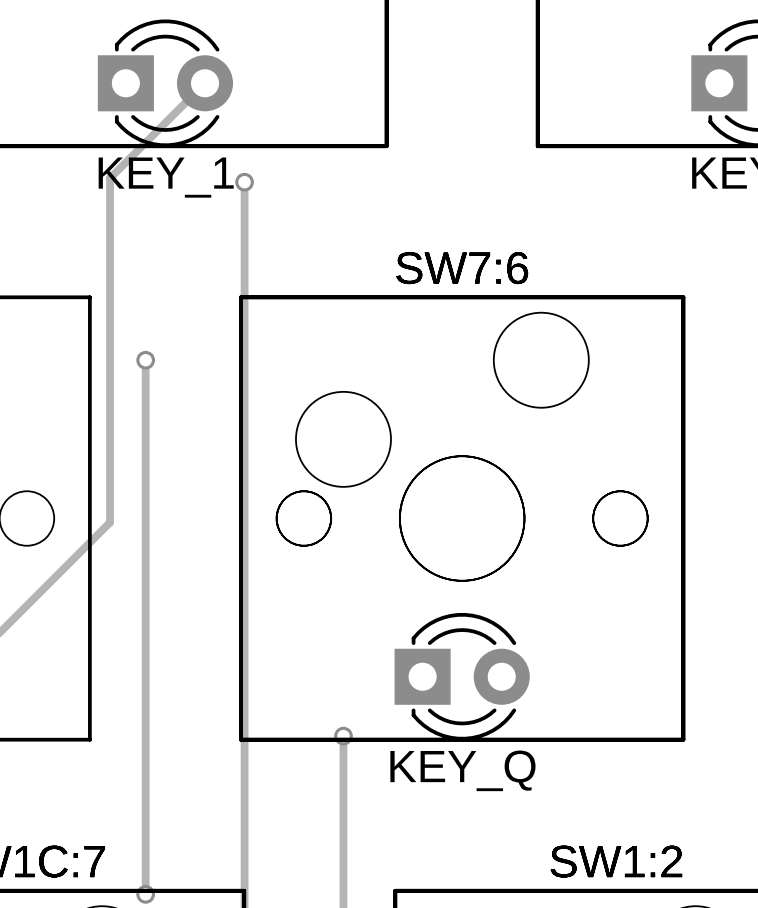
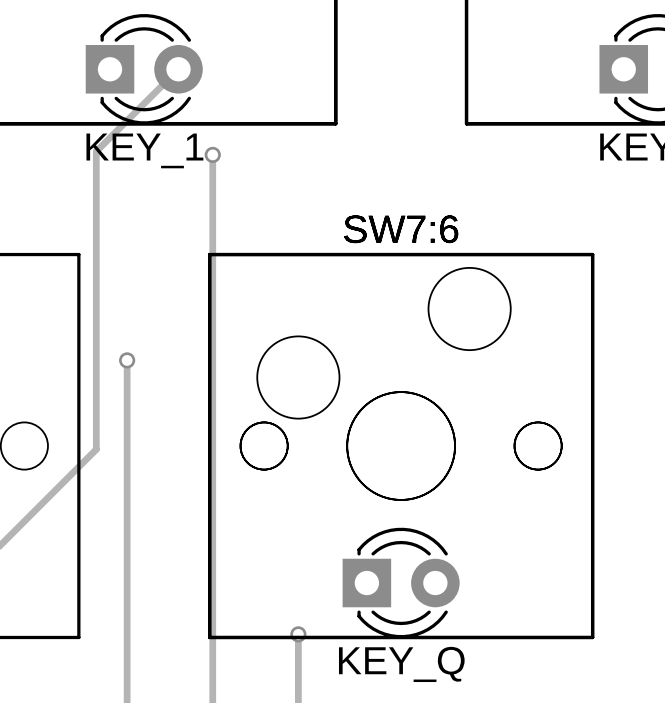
track: (145, 360) (145, 419) -> none
via position: (145, 360) -> (127, 360)

